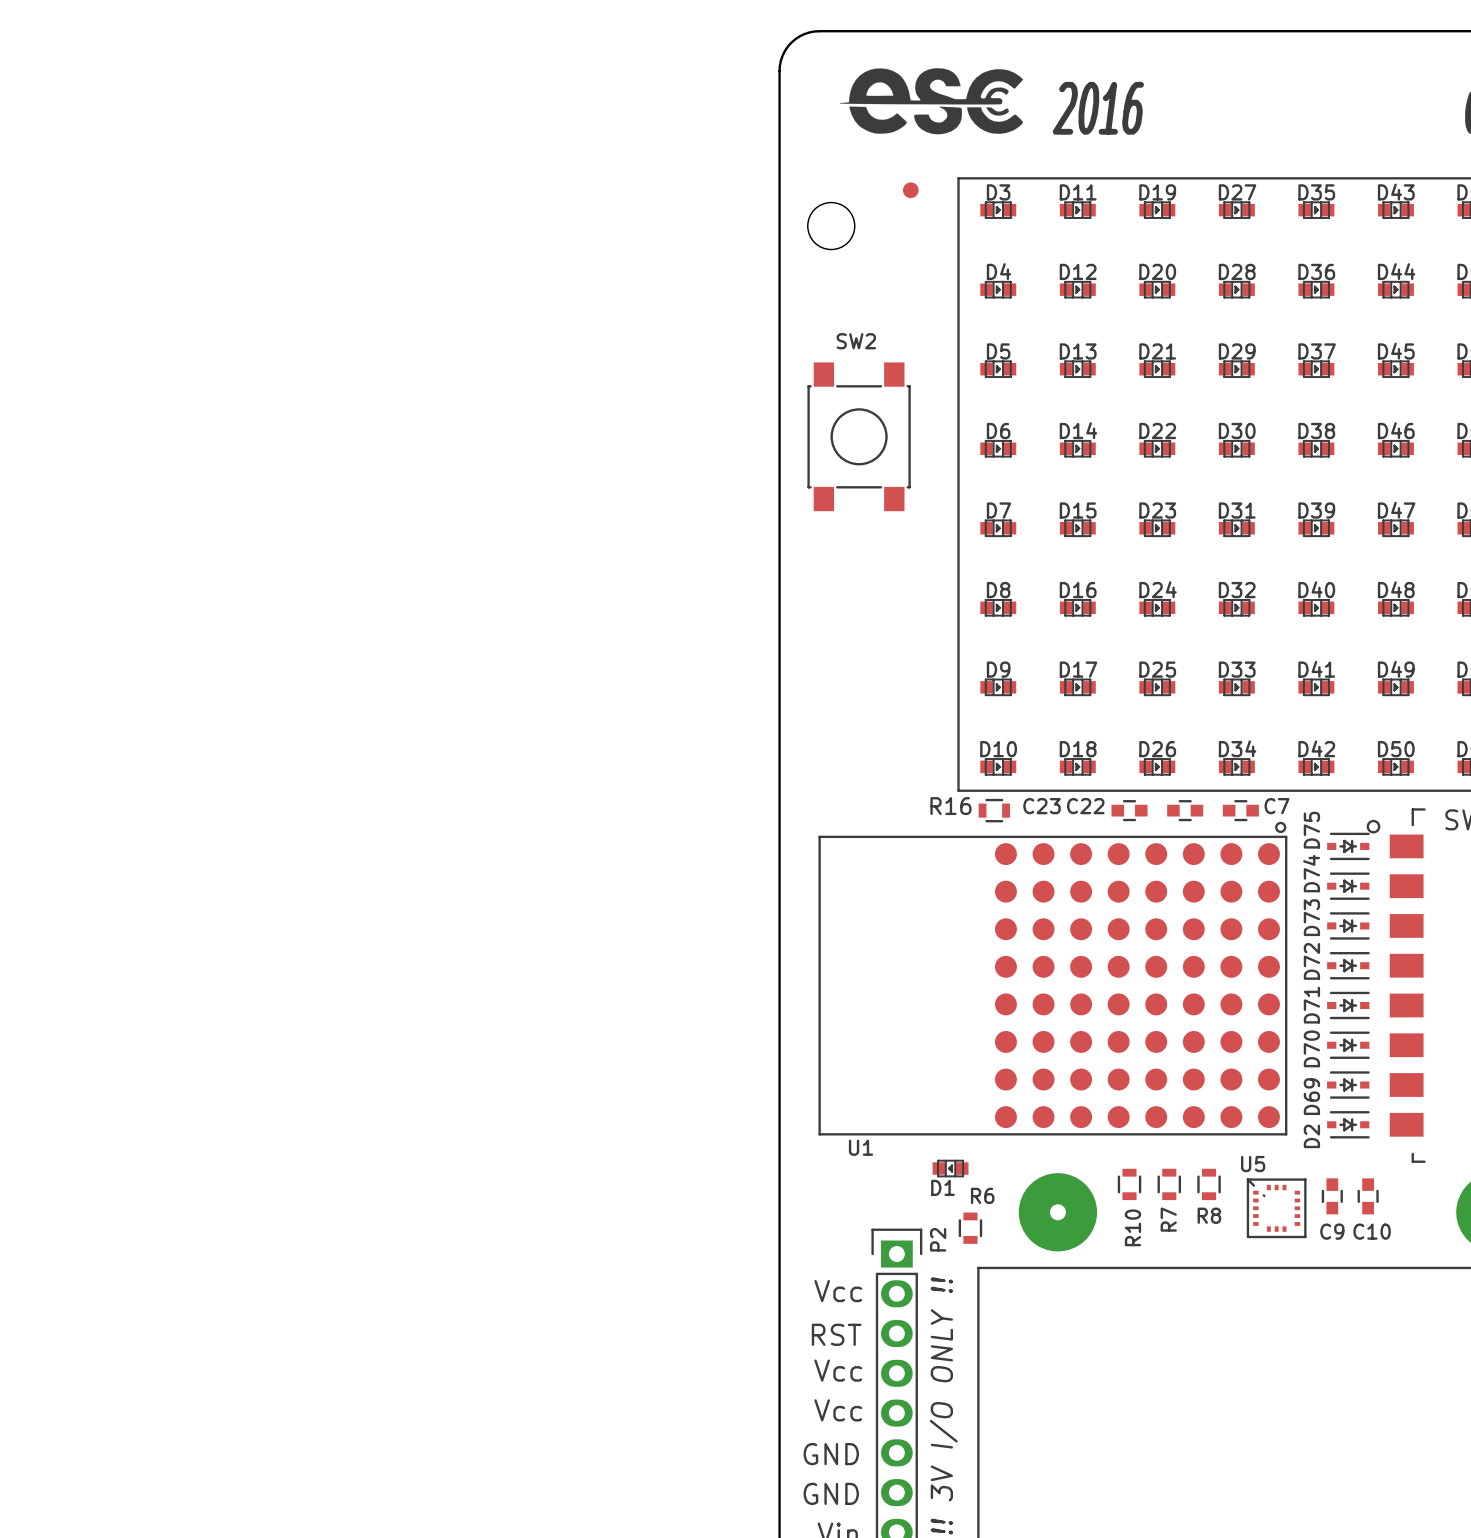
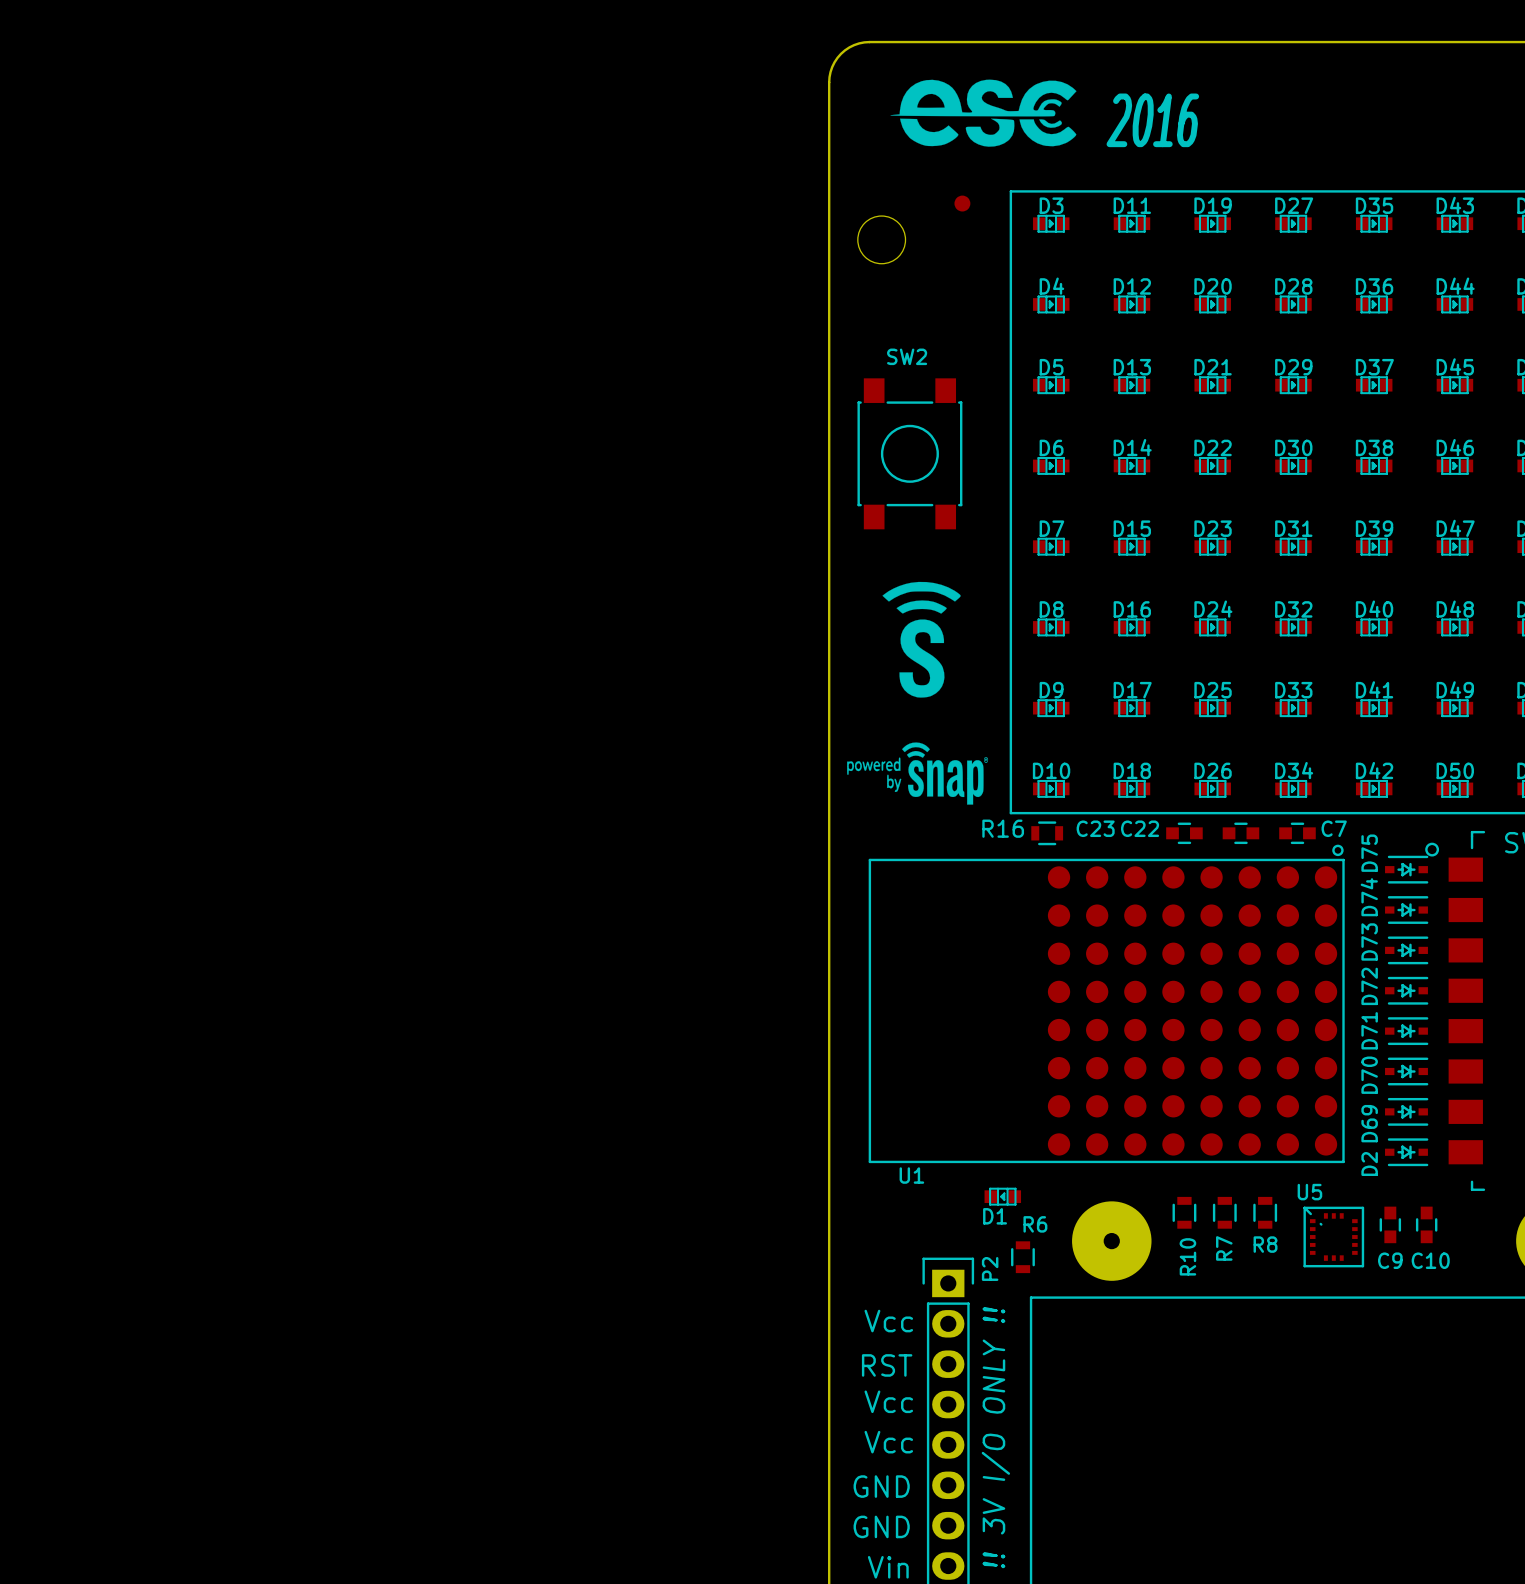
drawing: none -> [882, 581, 961, 698]
drawing: none -> [847, 742, 989, 805]

